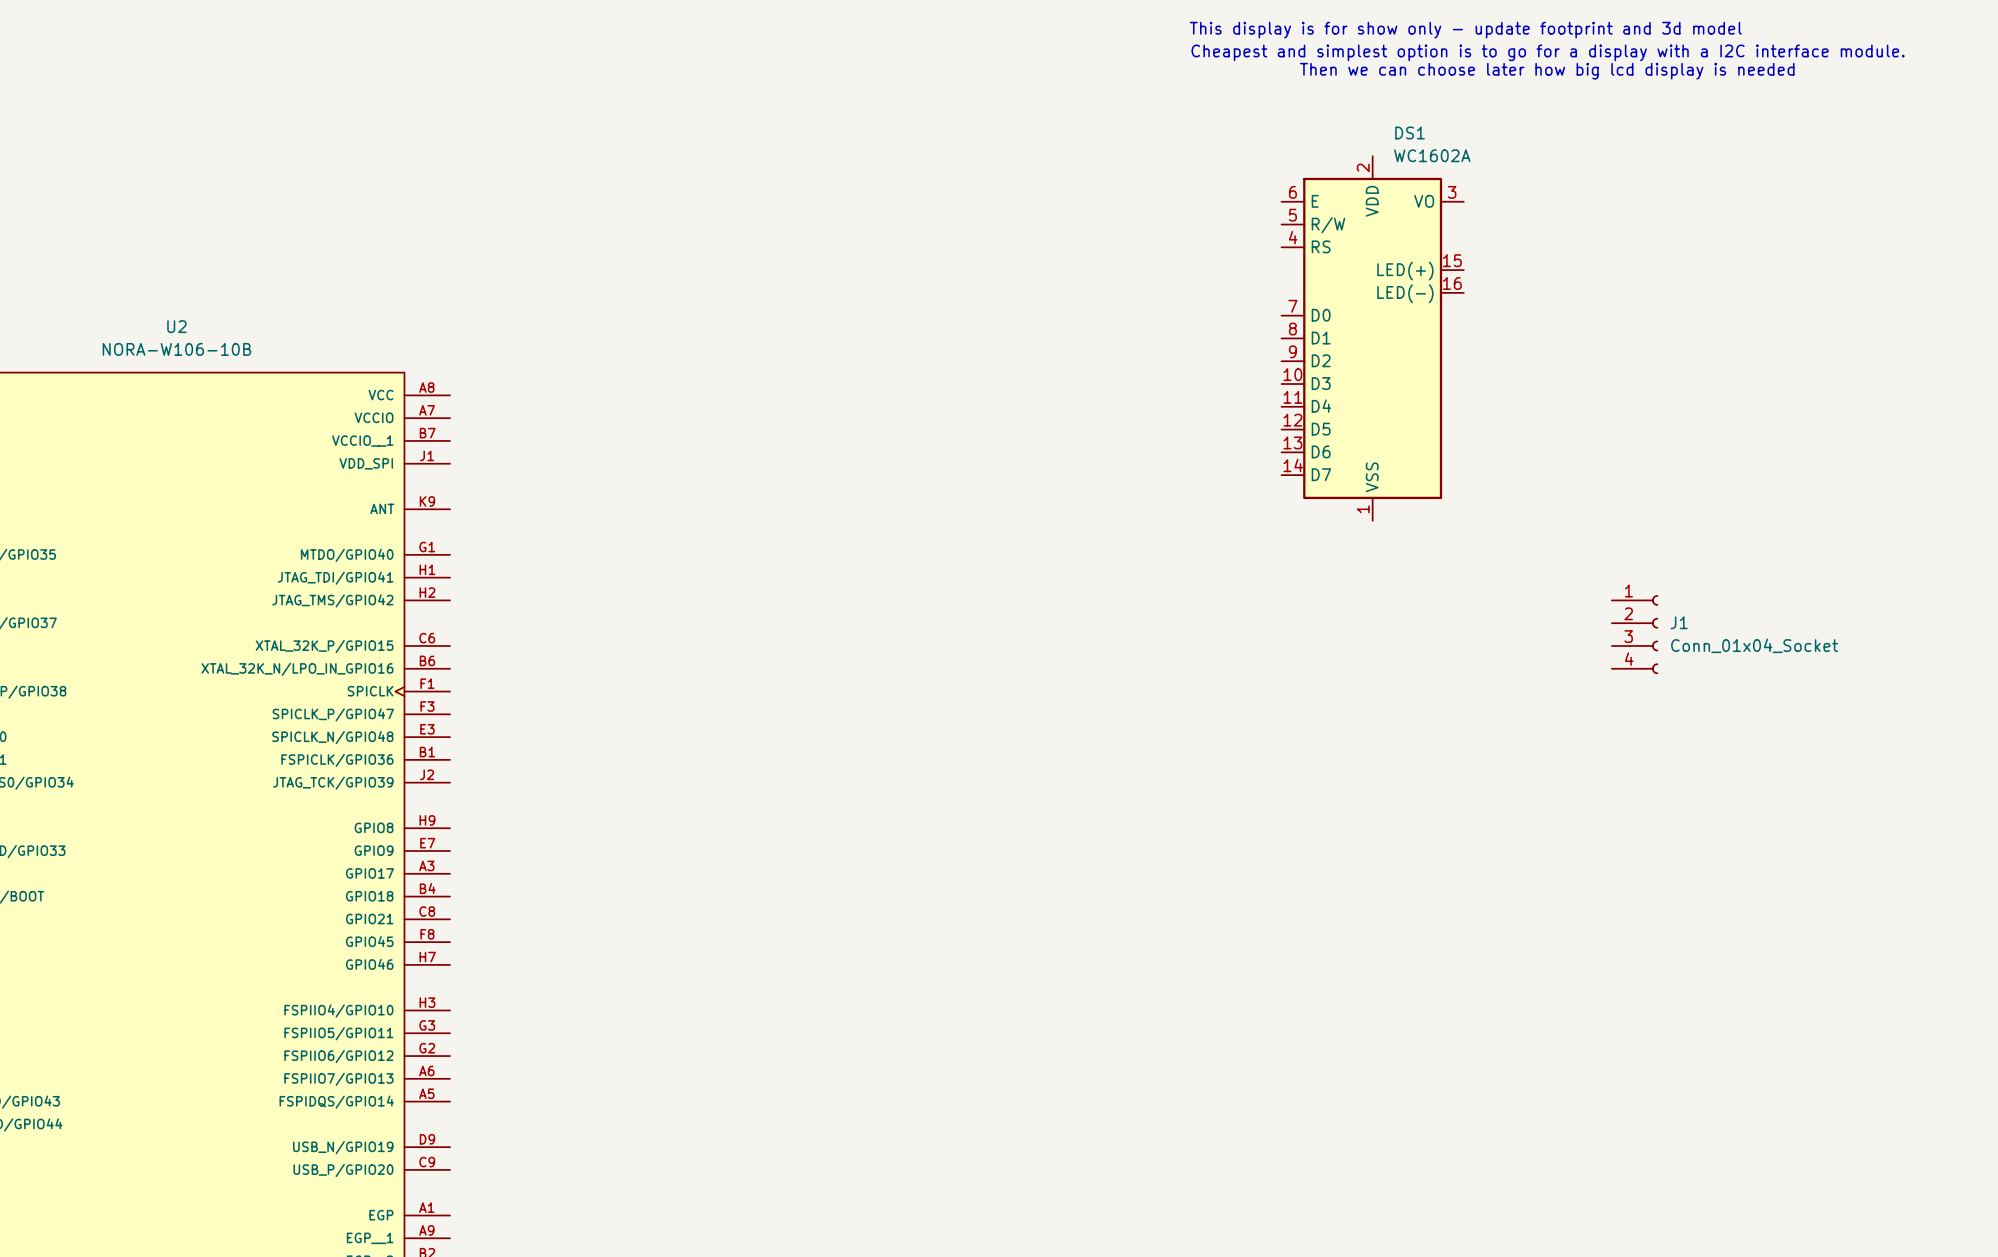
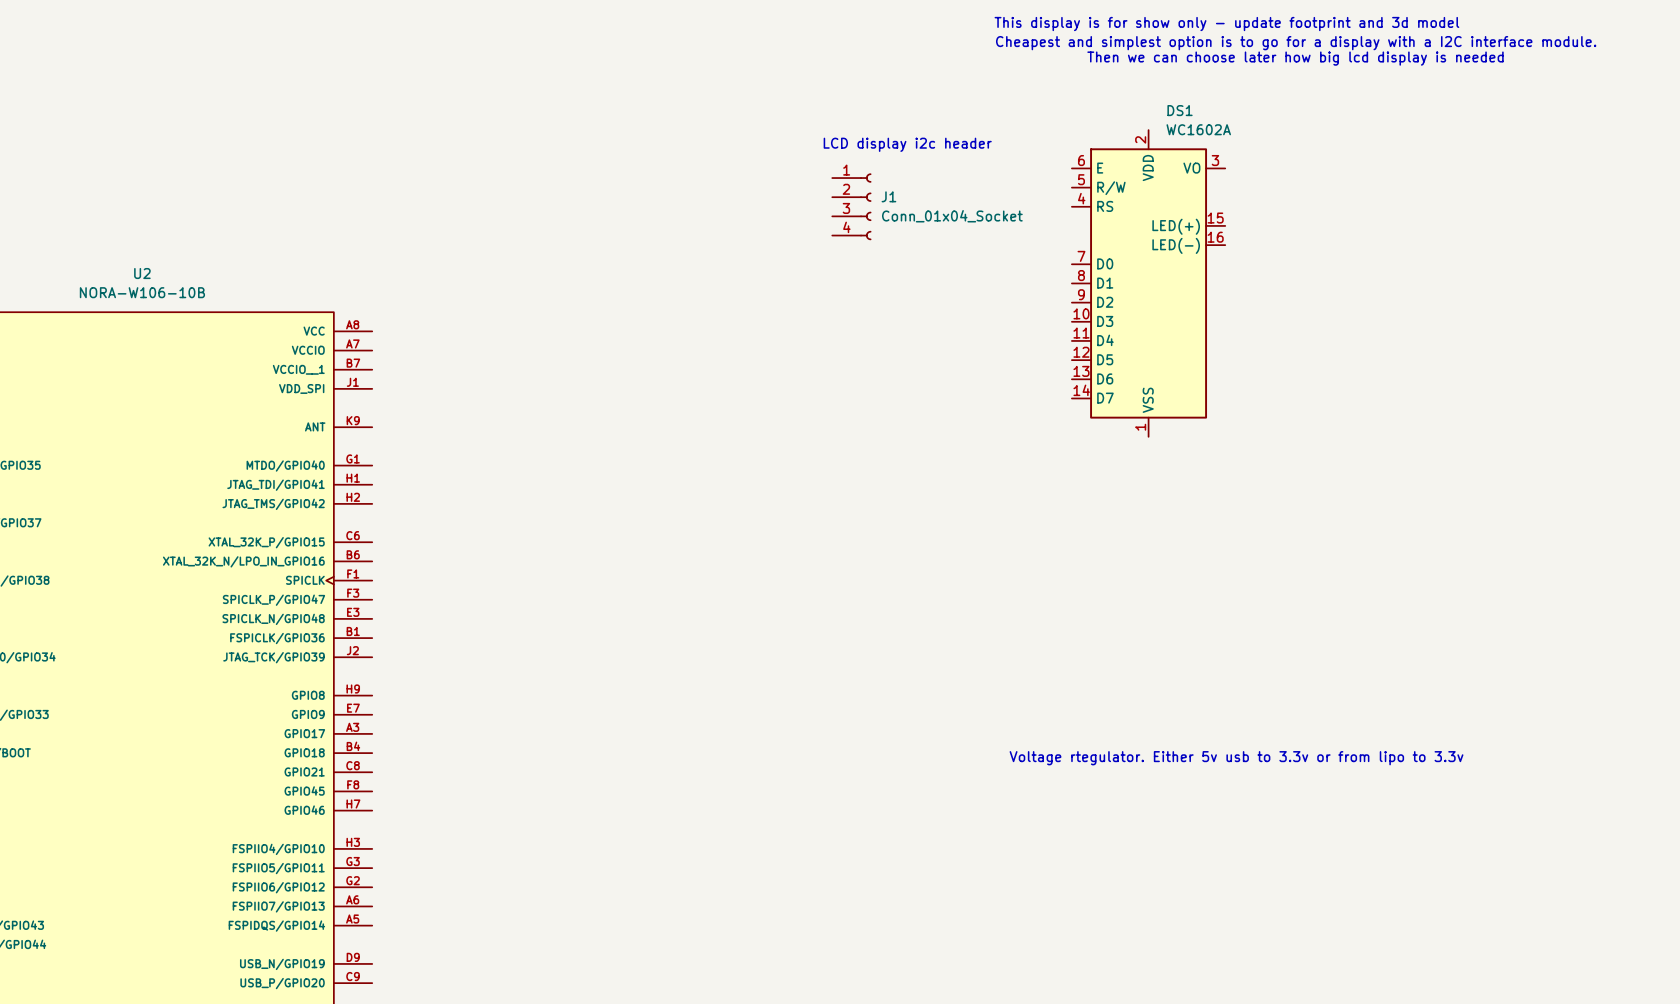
text: none -> LCD display i2c header (907, 144)
J1 position: (1634, 634) -> (851, 206)
text: none -> Voltage rtegulator. Either 5v usb to 3.3v or from lipo to 3.3v (1236, 758)

